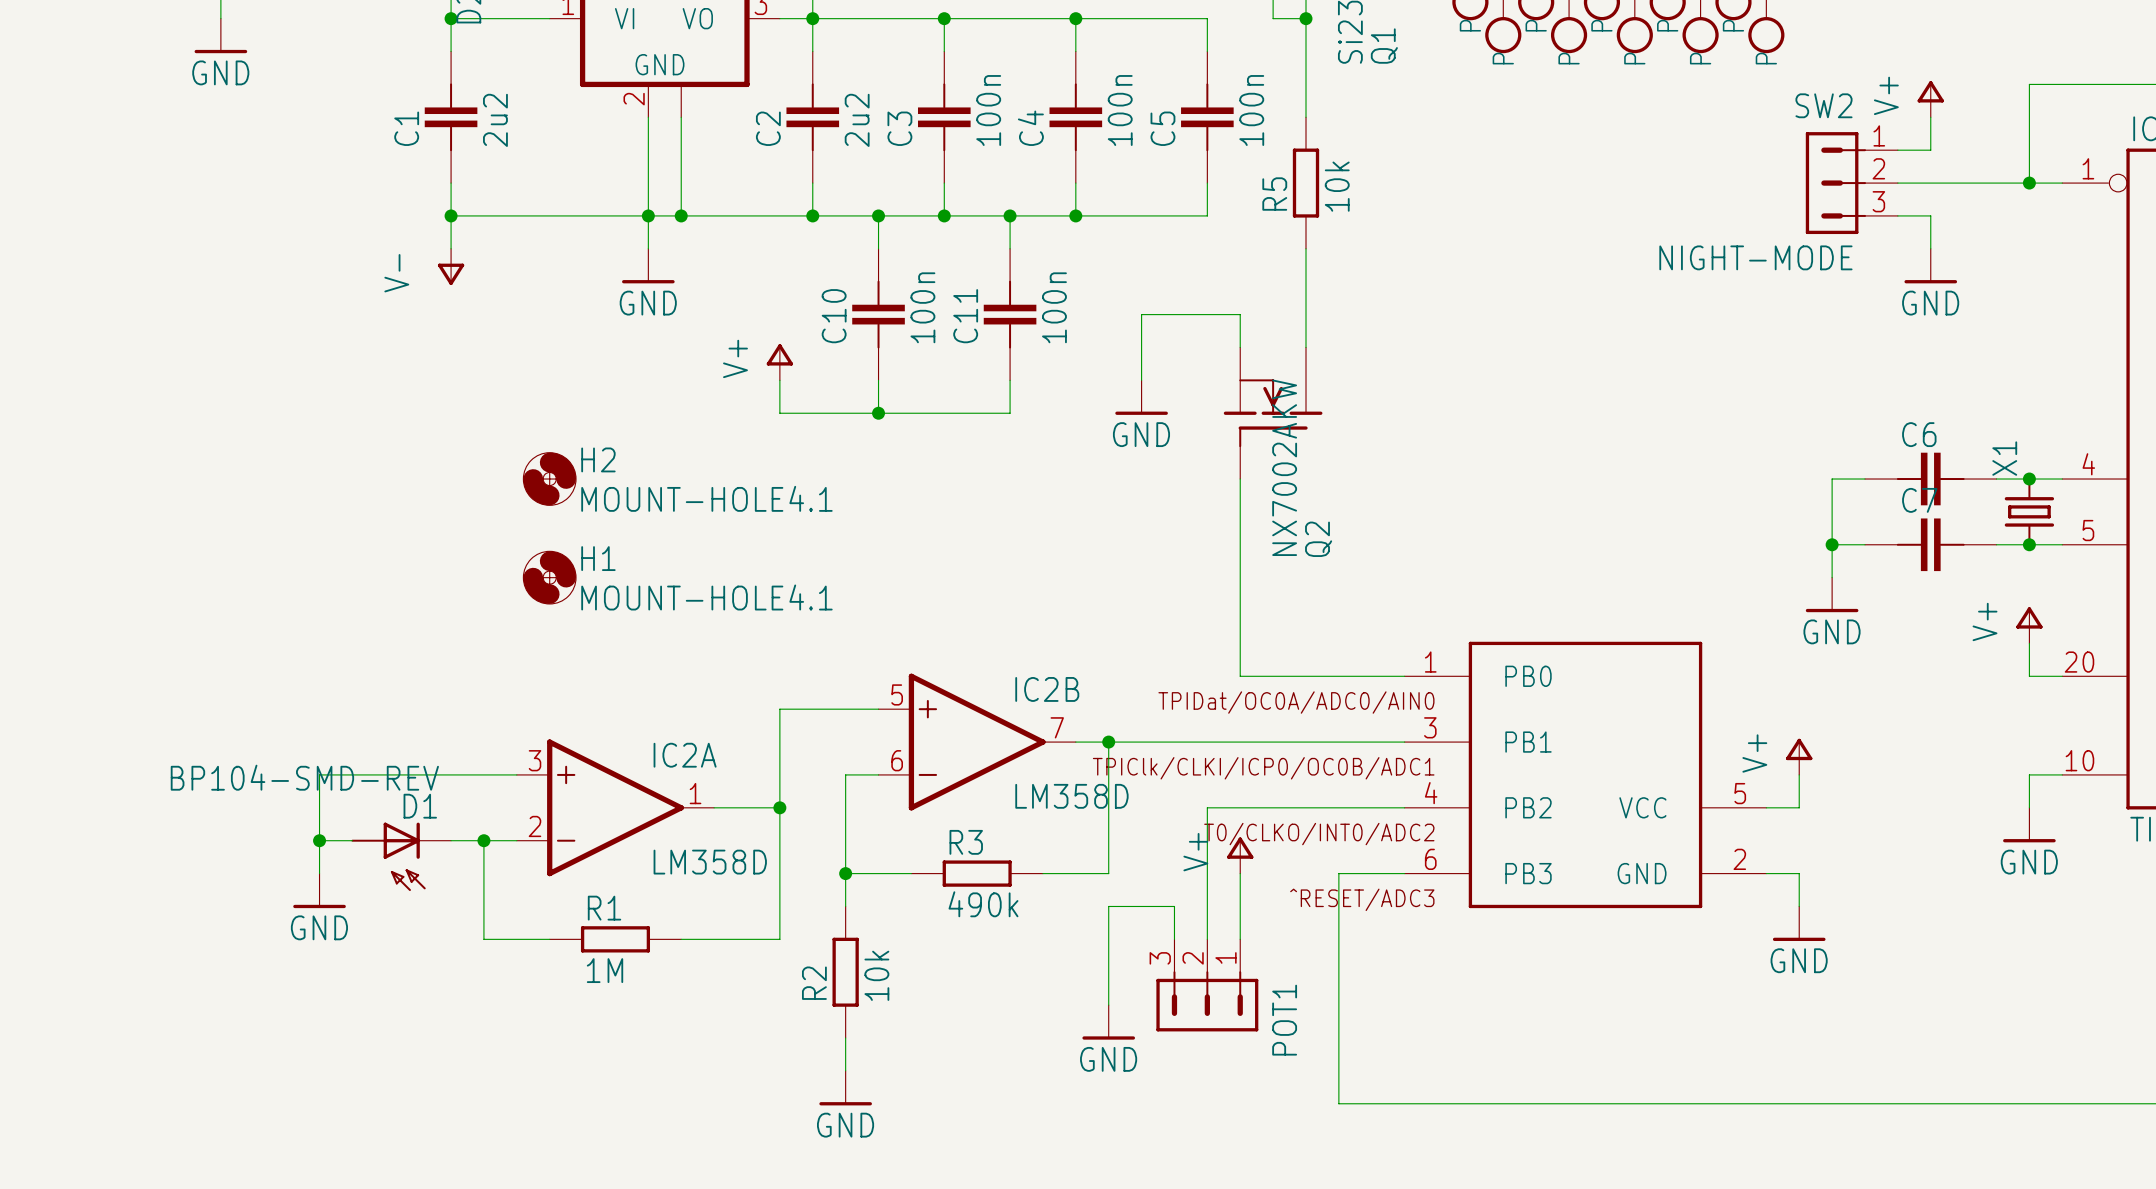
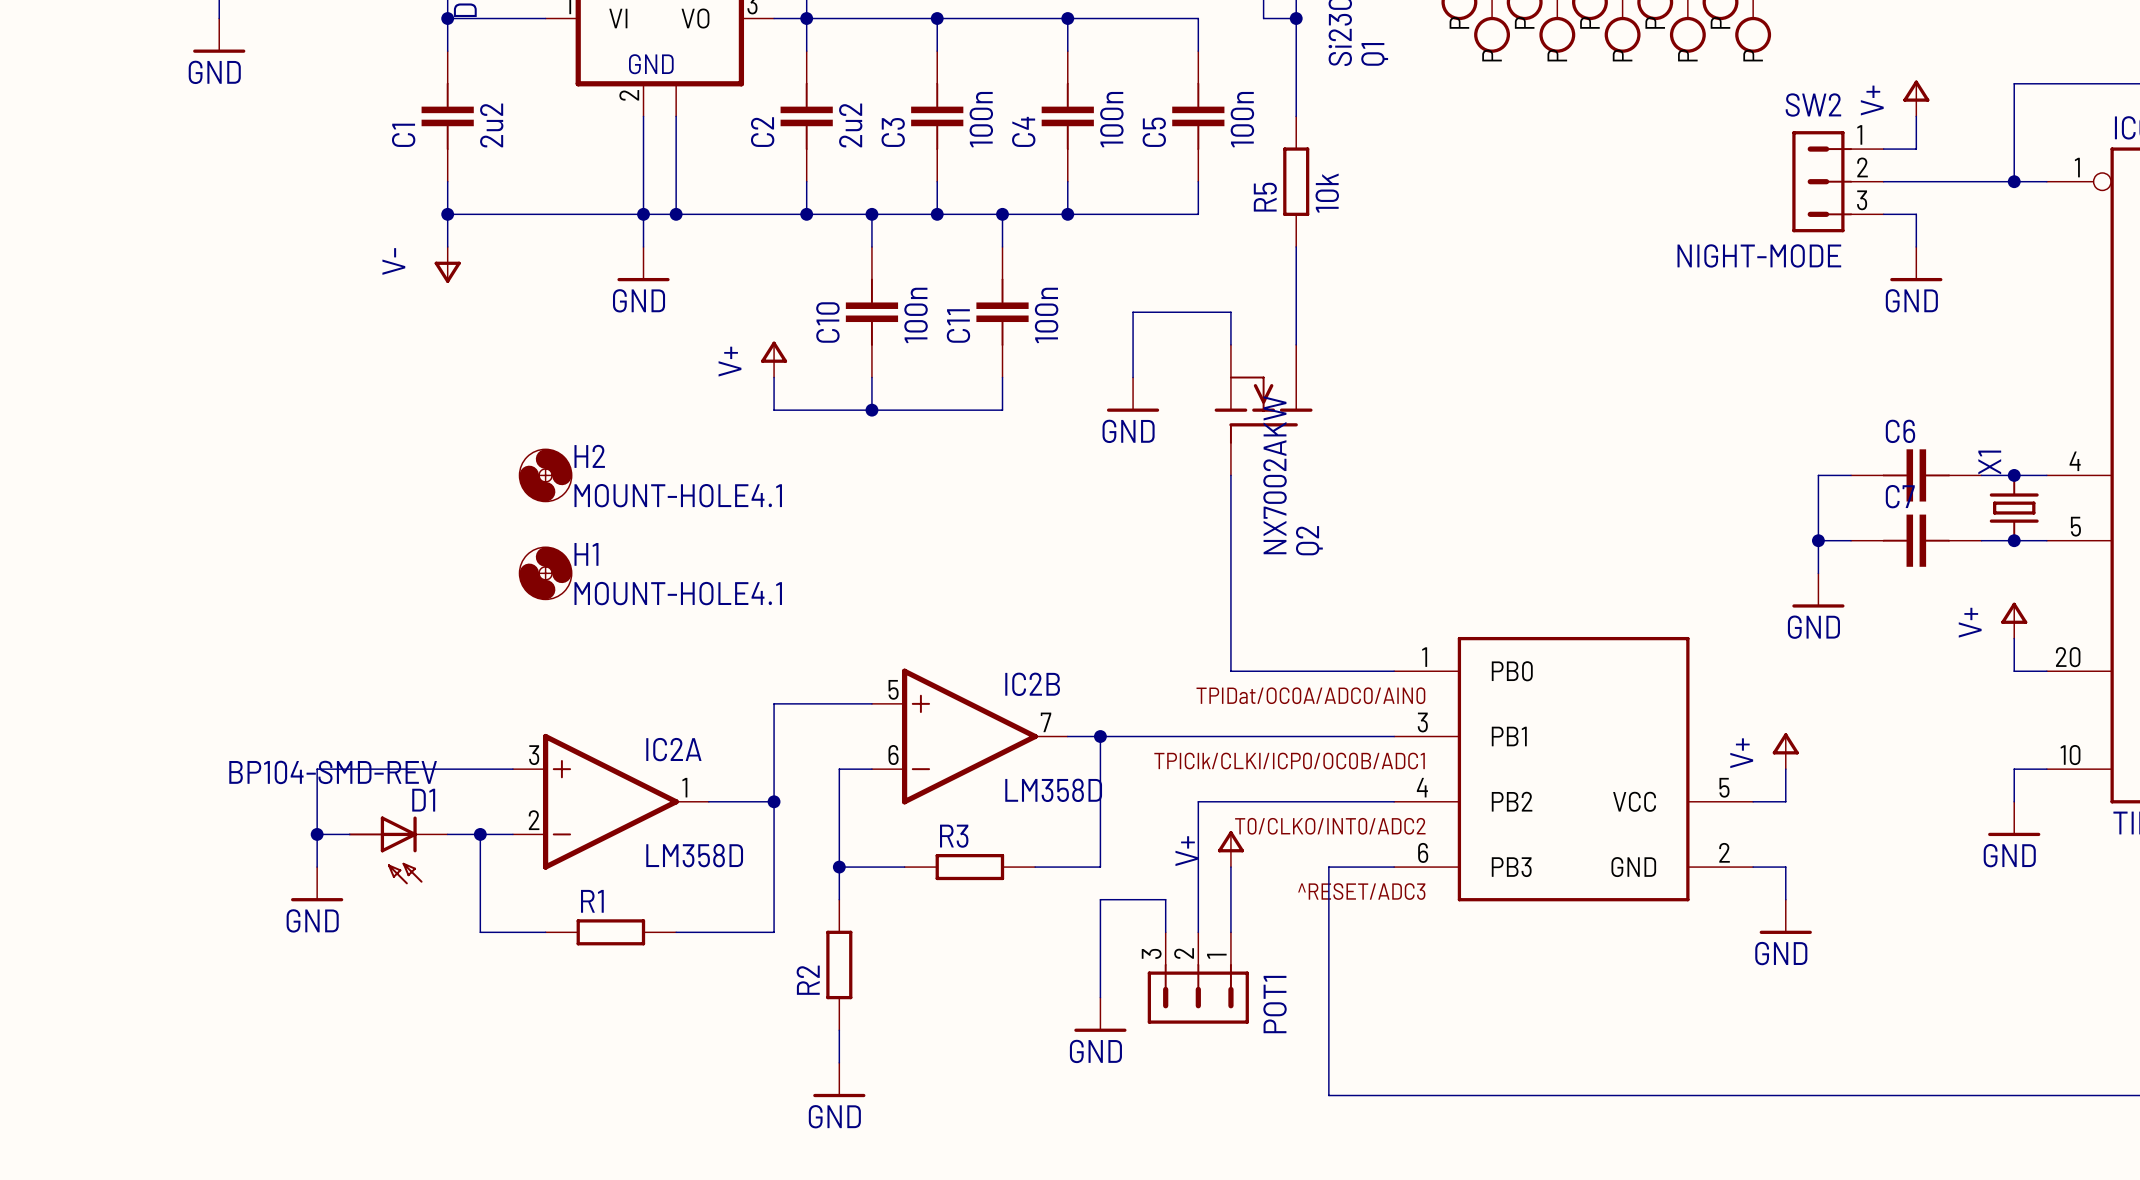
R3 value: 490k (983, 904) -> none
R1 value: 1M (605, 970) -> none
R2 value: 10k (876, 975) -> none

